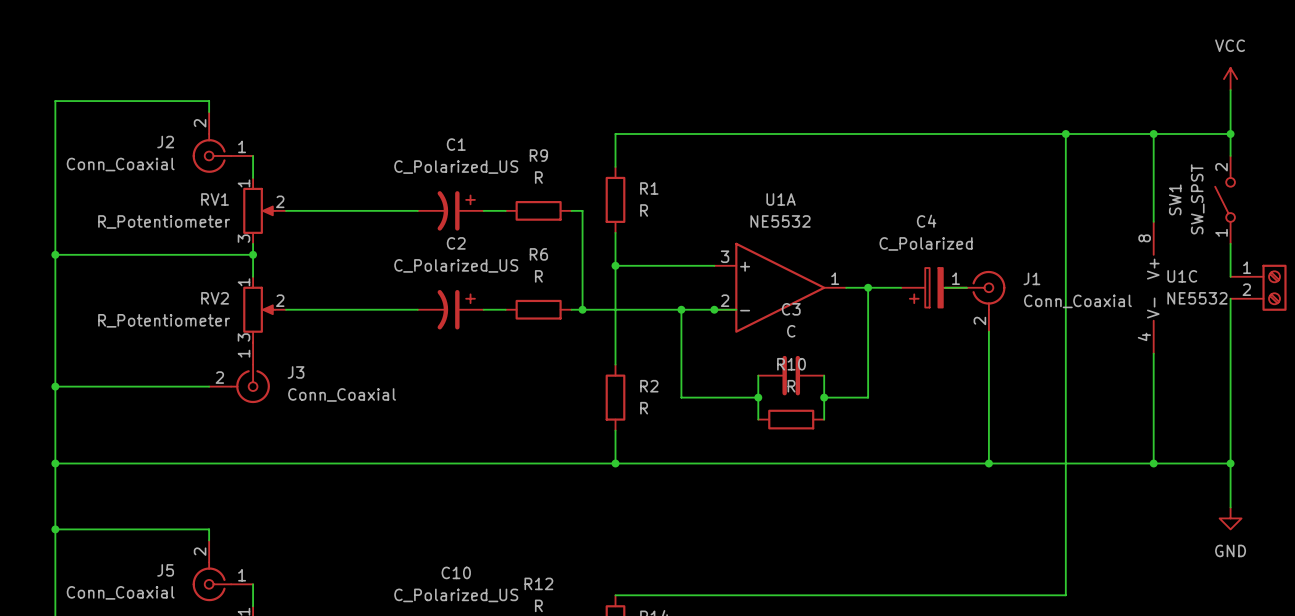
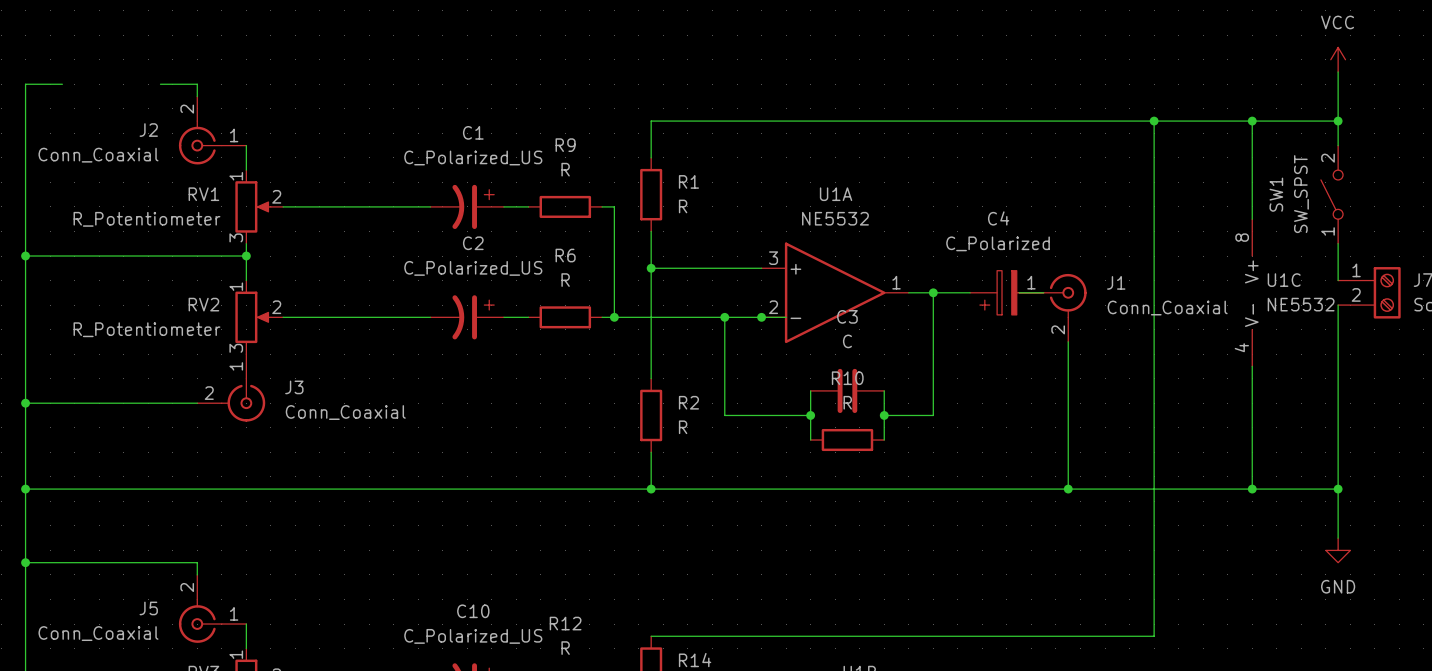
wire: (88, 101) (176, 101) -> none

